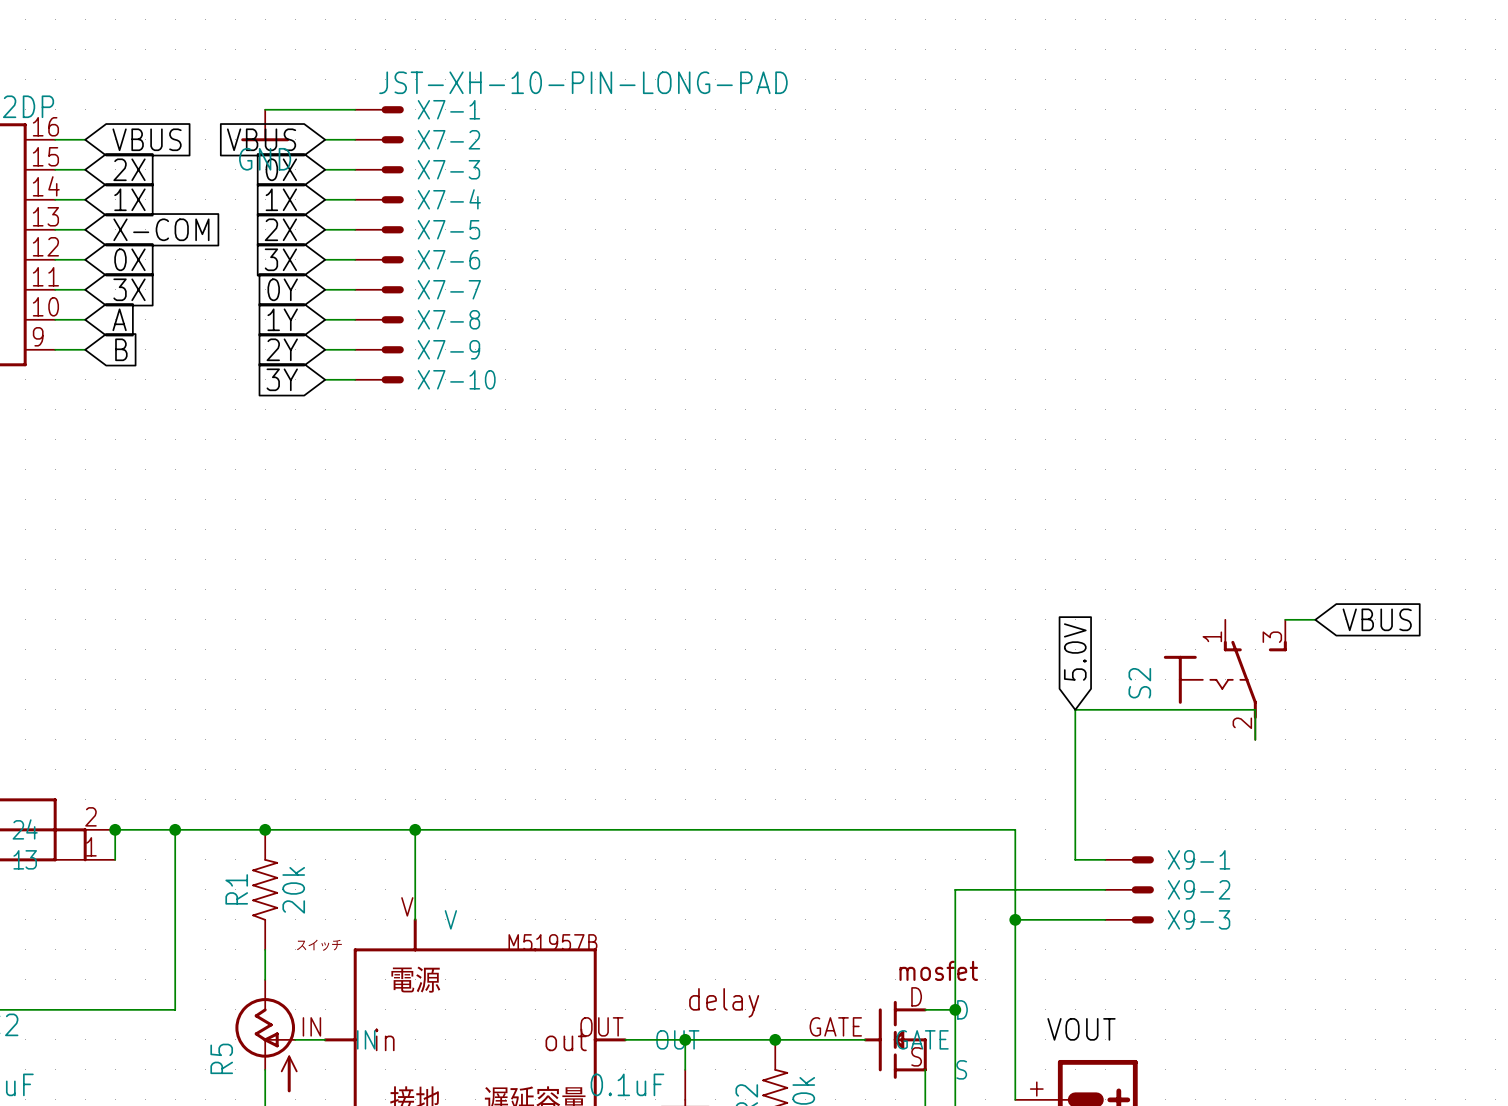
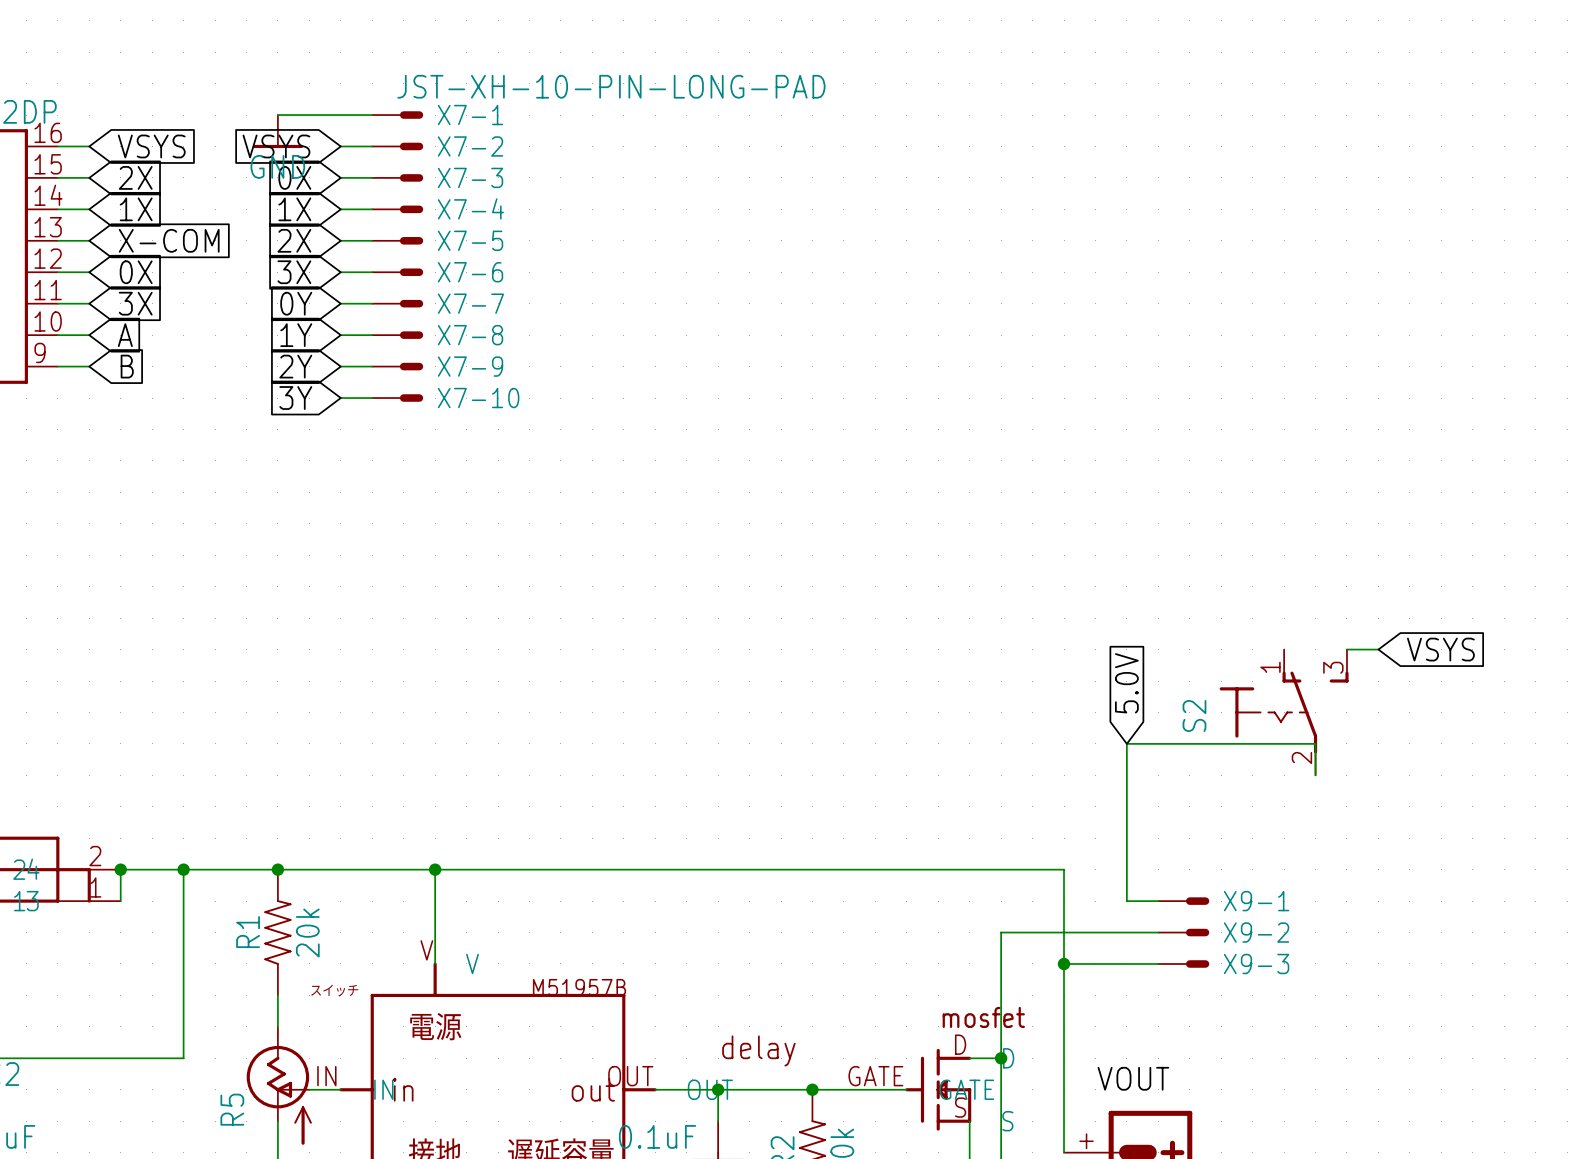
global label: VBUS (147, 139) -> VSYS (151, 146)
global label: VBUS (261, 139) -> VSYS (276, 146)
global label: VBUS (1377, 619) -> VSYS (1440, 649)

